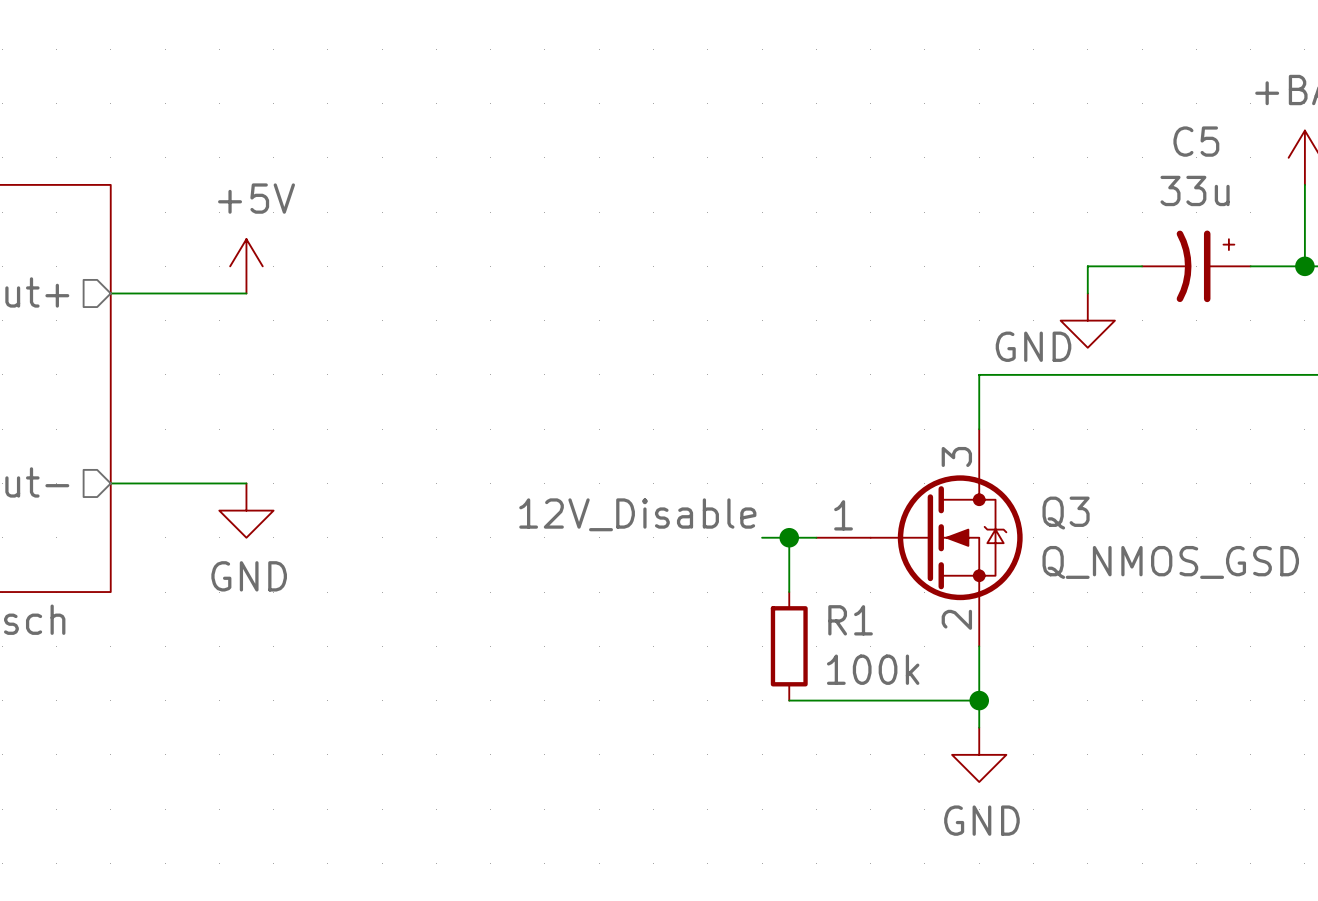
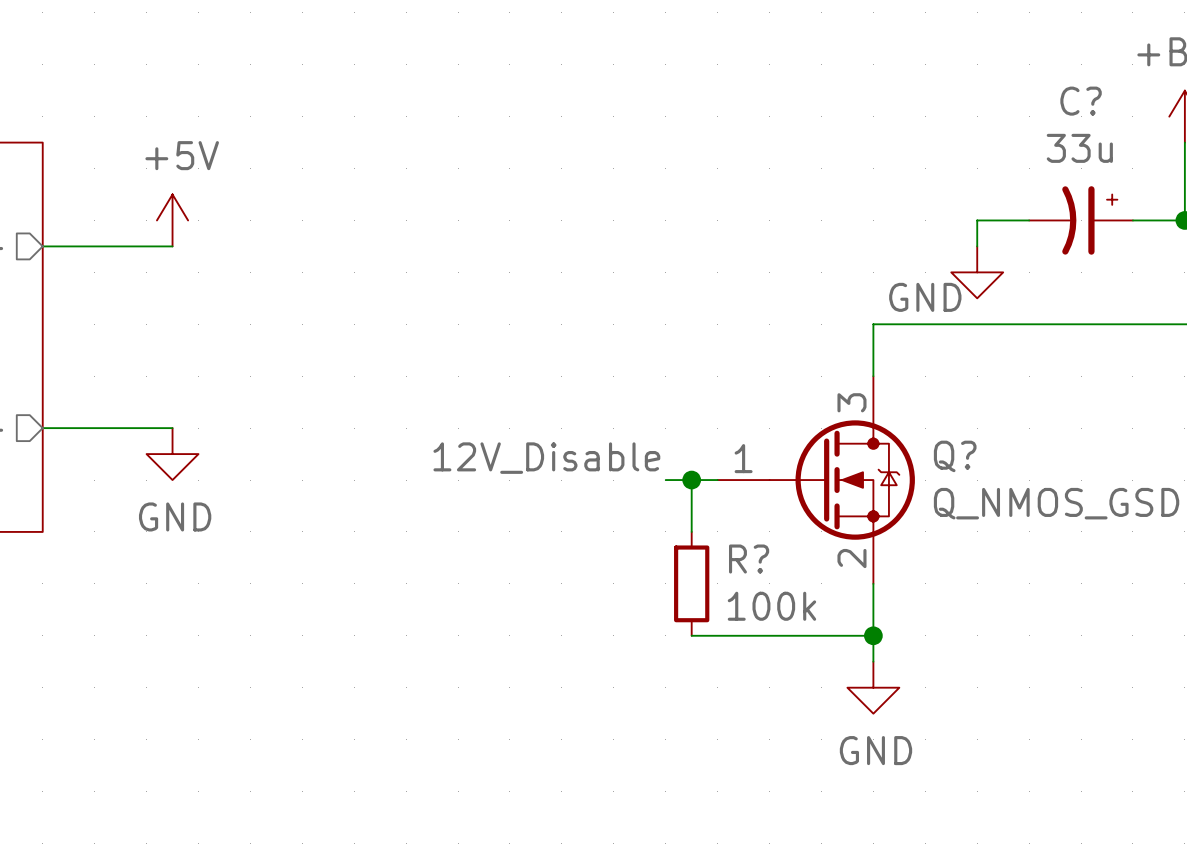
C5 name: C5 (1196, 141) -> C? (1081, 101)
Q3 name: Q3 (1066, 513) -> Q? (955, 456)
R1 name: R1 (850, 620) -> R? (749, 559)

